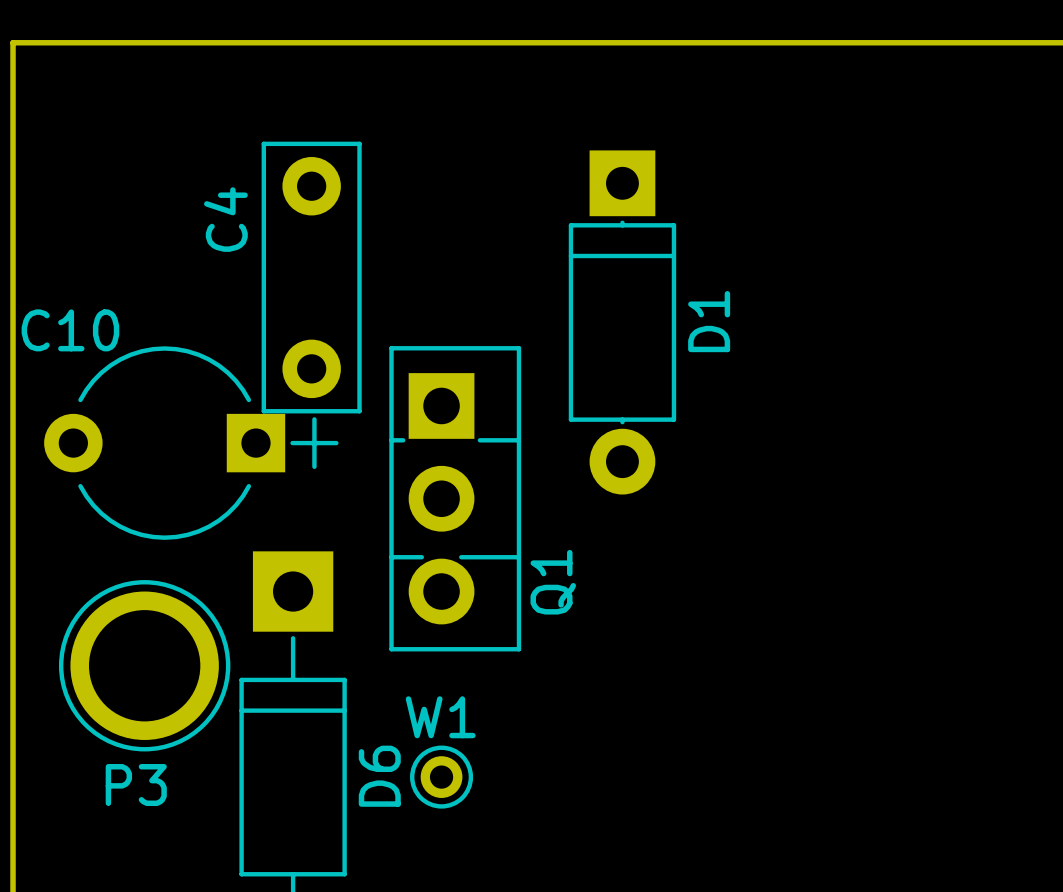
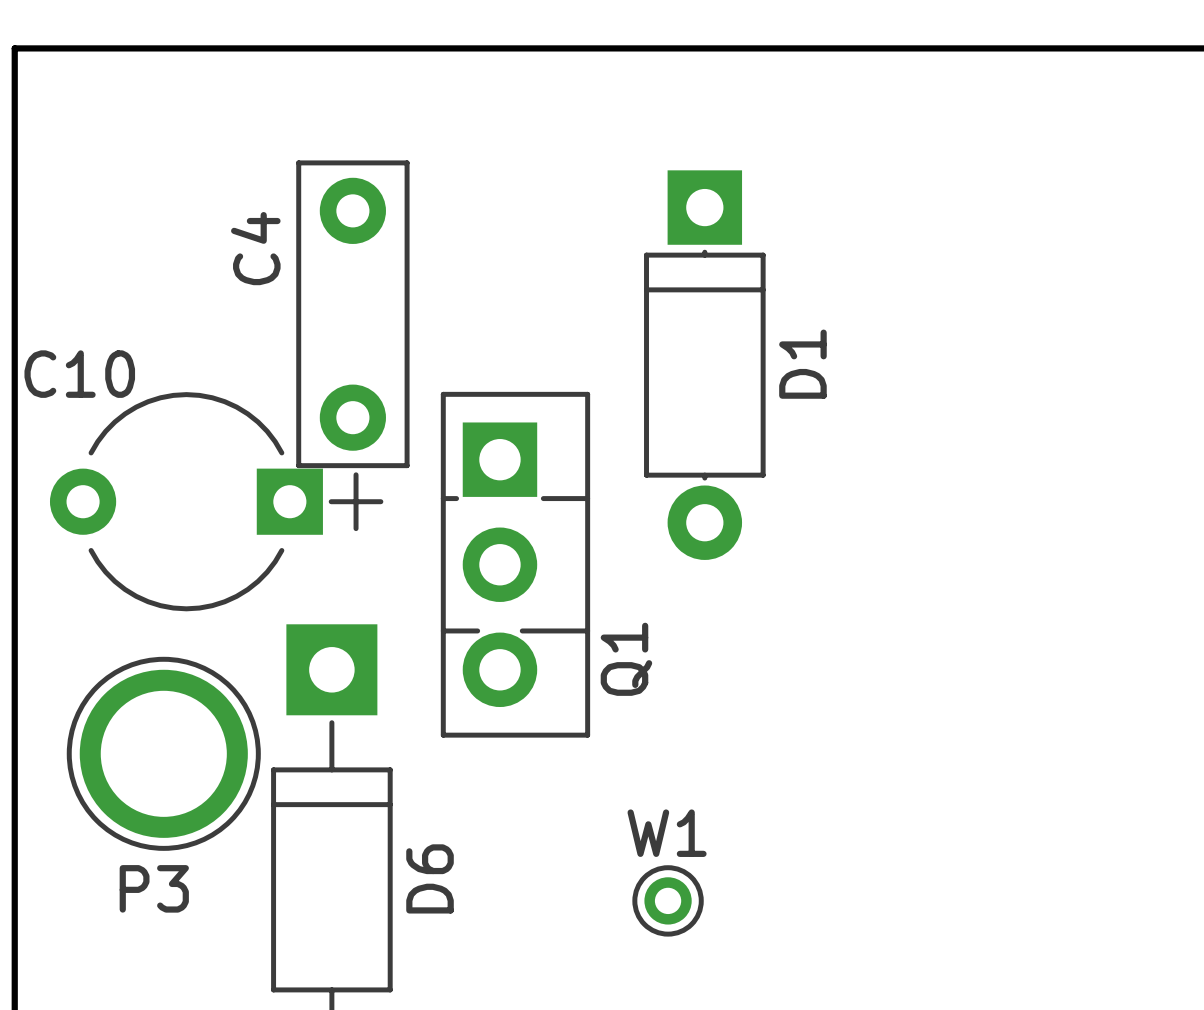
W1 position: (441, 777) -> (668, 900)

